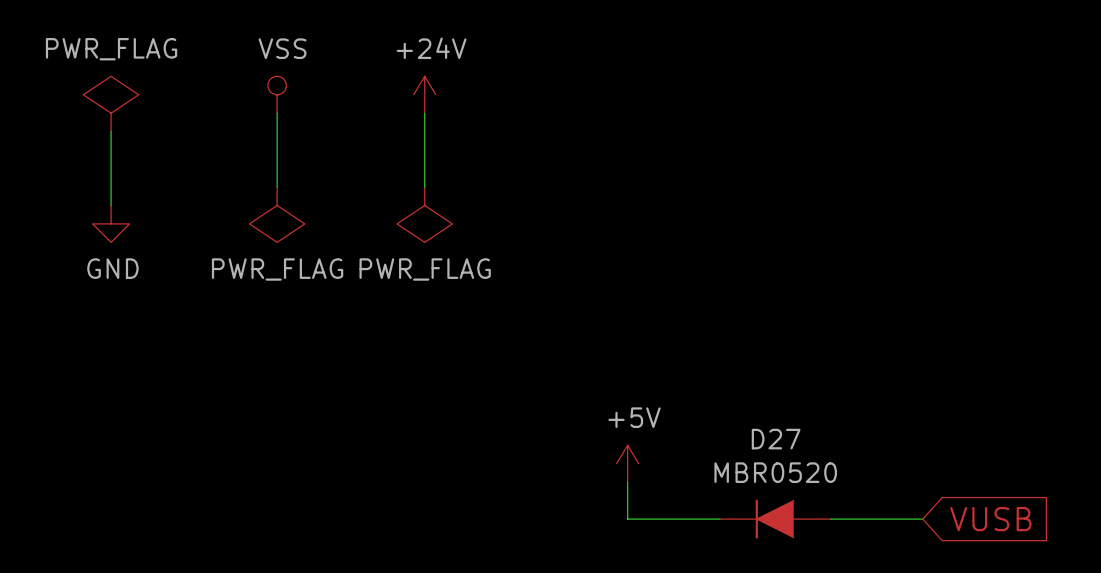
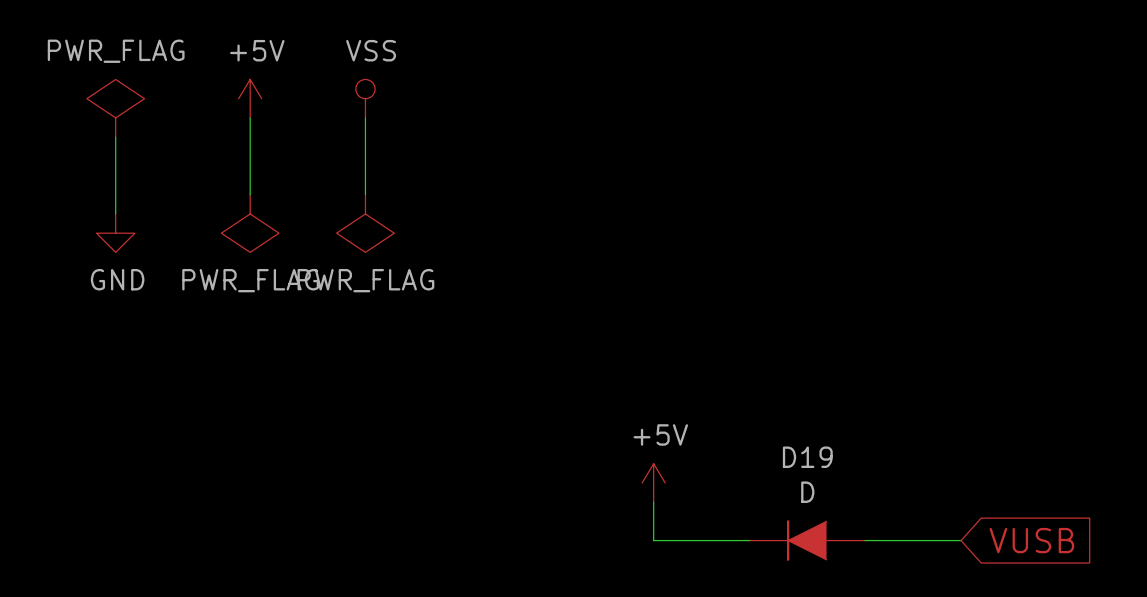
power symbol: none -> +5V (250, 98)
power symbol position: VSS (277, 94) -> VSS (365, 98)
power symbol: +24V (424, 94) -> none
wire: (277, 113) (277, 187) -> (250, 117) (250, 194)
wire: (424, 113) (424, 187) -> (365, 117) (365, 194)
power symbol: none -> PWR_FLAG (250, 223)
power symbol: PWR_FLAG (277, 214) -> none
power symbol: none -> PWR_FLAG (365, 223)
power symbol: PWR_FLAG (424, 214) -> none
D27 name: D27 (776, 439) -> D19 (807, 457)
D27 value: MBR0520 (775, 472) -> D (807, 492)

